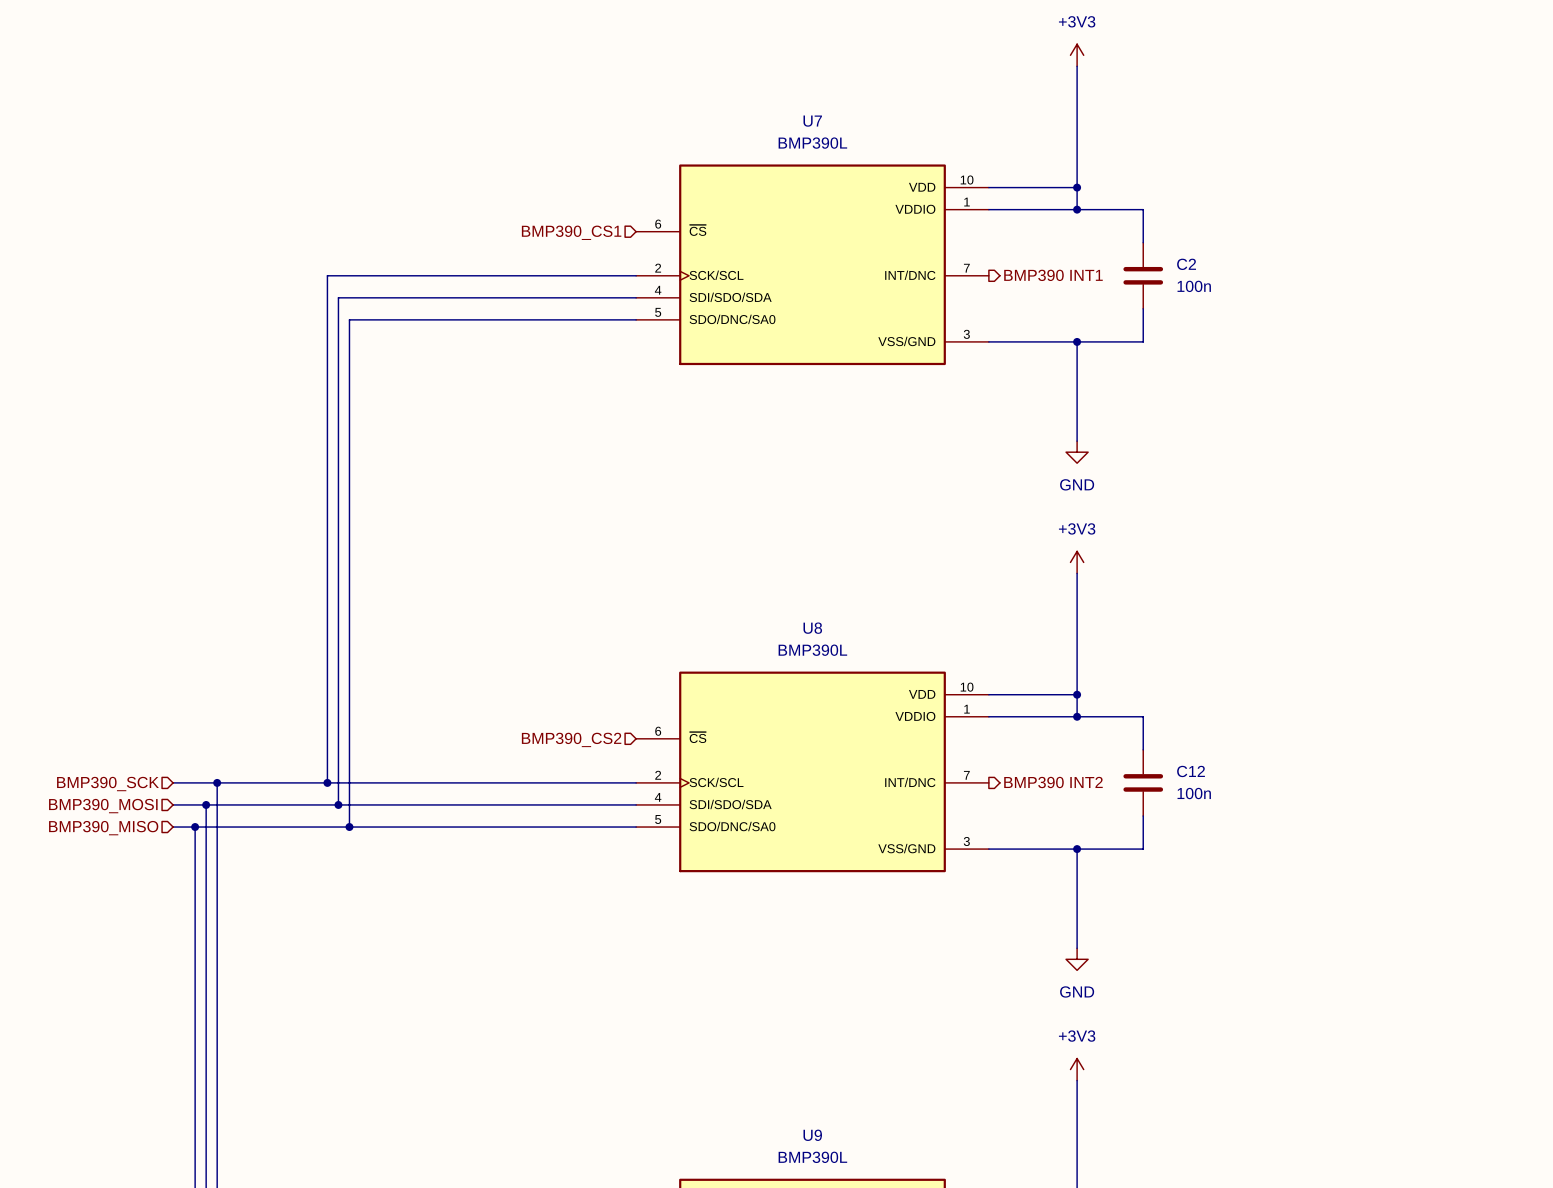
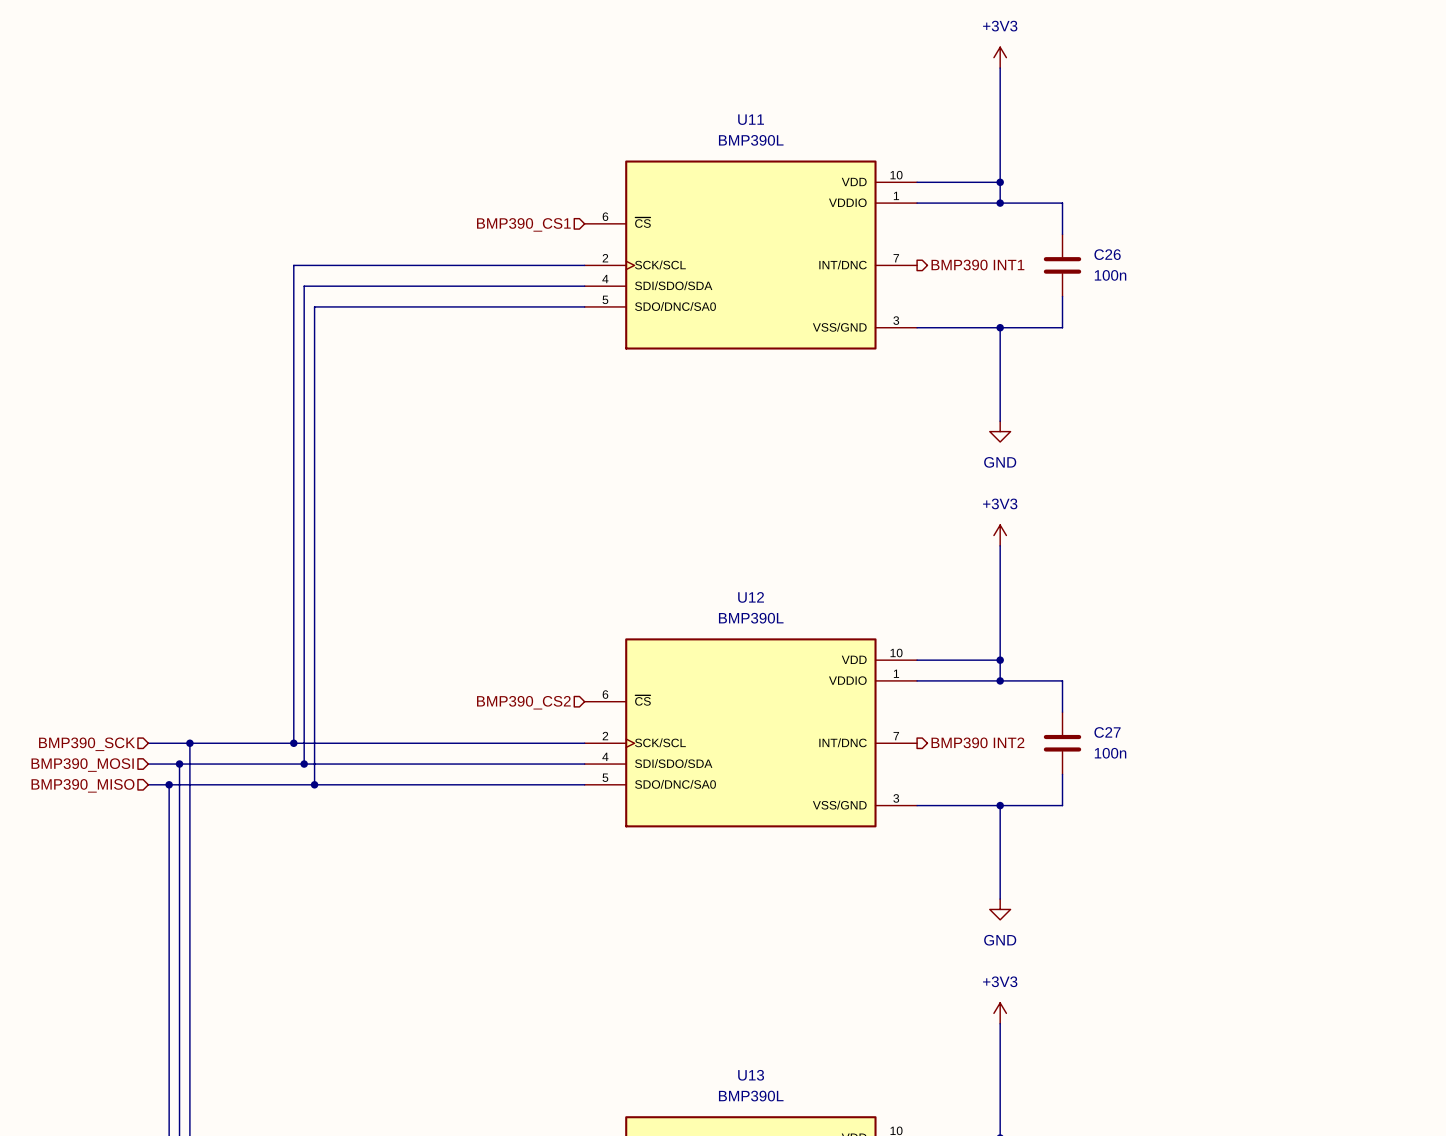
U7 name: U7 (812, 121) -> U11 (751, 119)
C2 name: C2 (1186, 264) -> C26 (1107, 254)
U8 name: U8 (812, 628) -> U12 (751, 597)
C12 name: C12 (1191, 771) -> C27 (1107, 732)
U9 name: U9 (812, 1135) -> U13 (751, 1075)

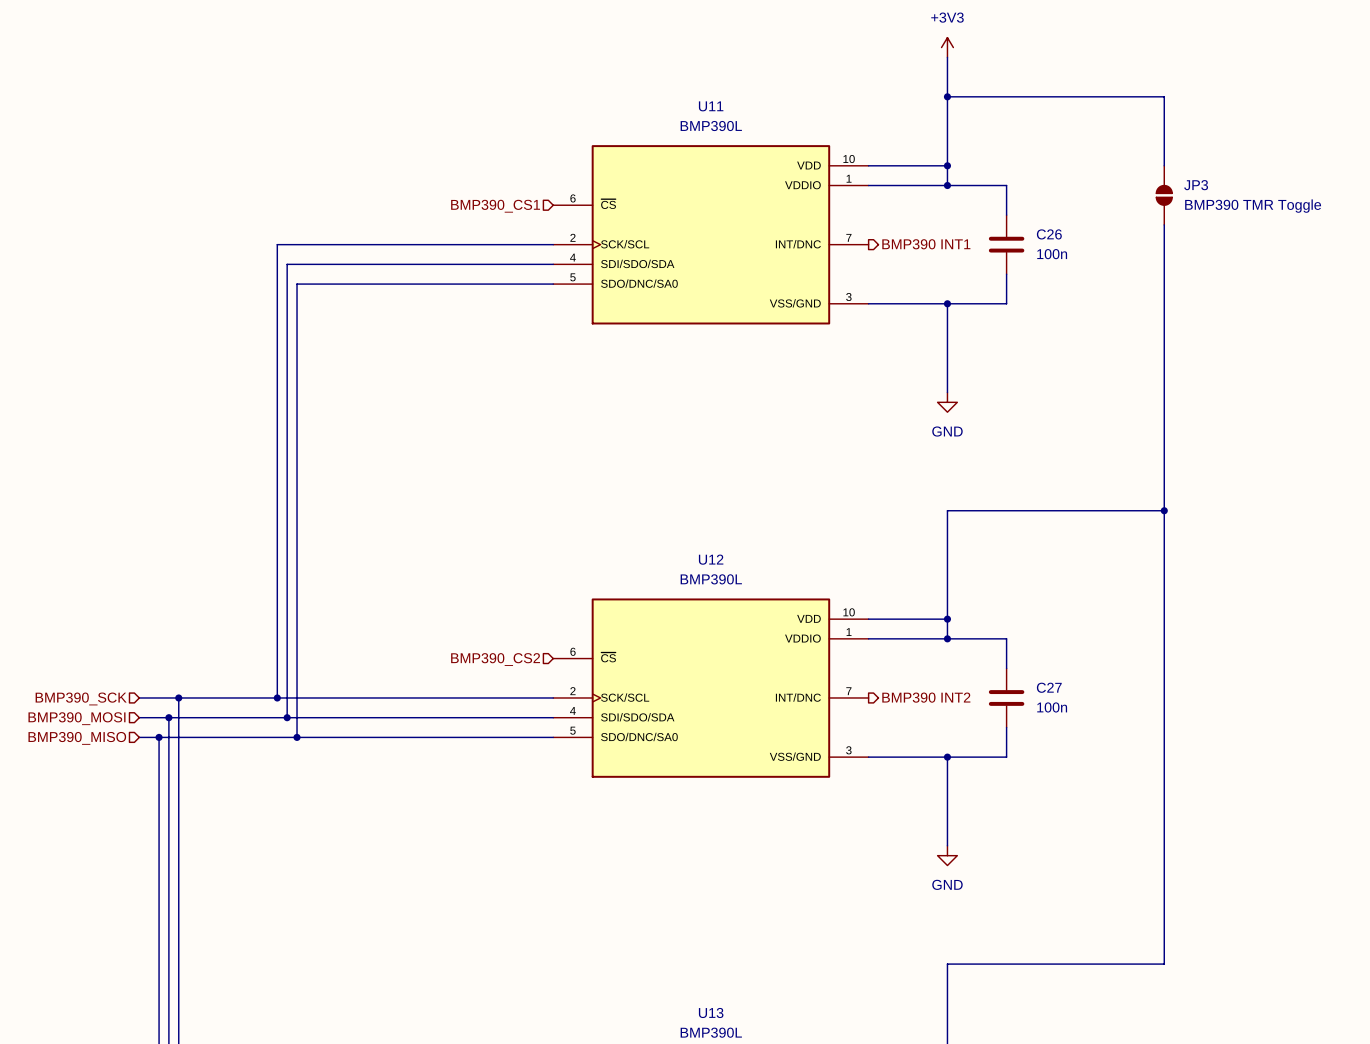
wire: none -> (947, 96) (1164, 96) (1164, 165)
junction: none -> (947, 96)
JP3: none -> BMP390 TMR Toggle (1164, 195)
wire: none -> (1164, 224) (1164, 964) (947, 964)
power symbol: +3V3 (1000, 535) -> none
wire: none -> (947, 510) (1164, 510)
junction: none -> (1164, 510)
power symbol: +3V3 (1000, 1013) -> none

